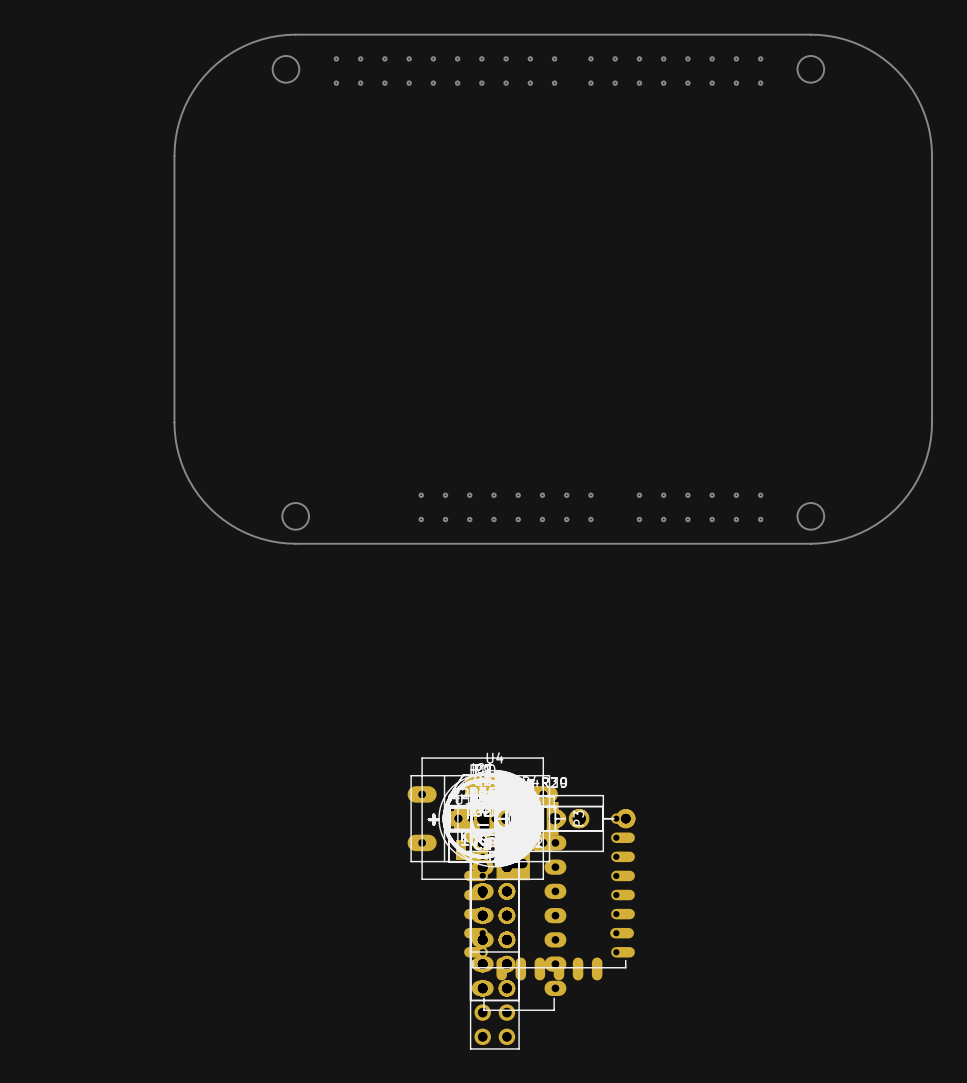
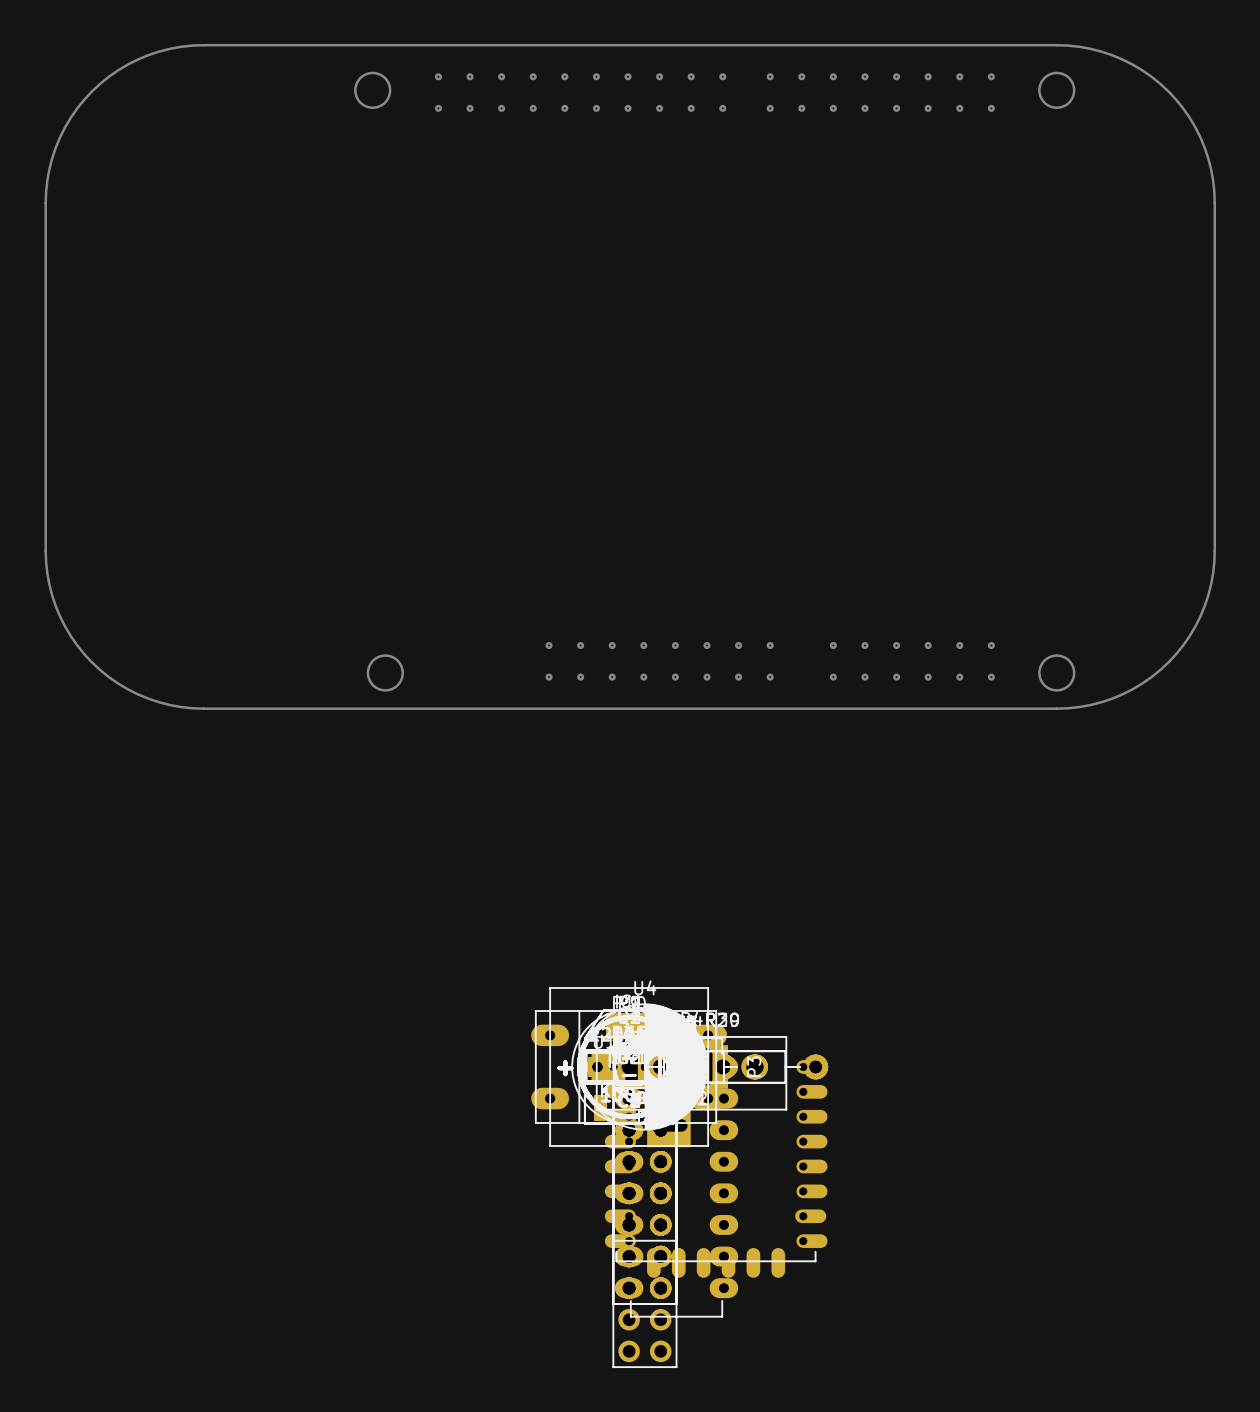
line: (295, 34) (278, 35) (253, 42) (230, 53) (209, 70) (193, 90) (185, 105) (177, 130) (174, 155) (174, 422) (179, 456) (193, 488) (209, 508) (223, 519) (245, 532) (261, 538) (295, 543) -> (385, 45) (192, 45) (159, 51) (138, 59) (118, 70) (100, 83) (84, 99) (70, 117) (59, 137) (52, 158) (47, 180) (45, 203) (46, 561) (52, 595) (59, 616) (70, 636) (91, 662) (118, 683) (138, 694) (170, 705) (203, 708) (385, 708)

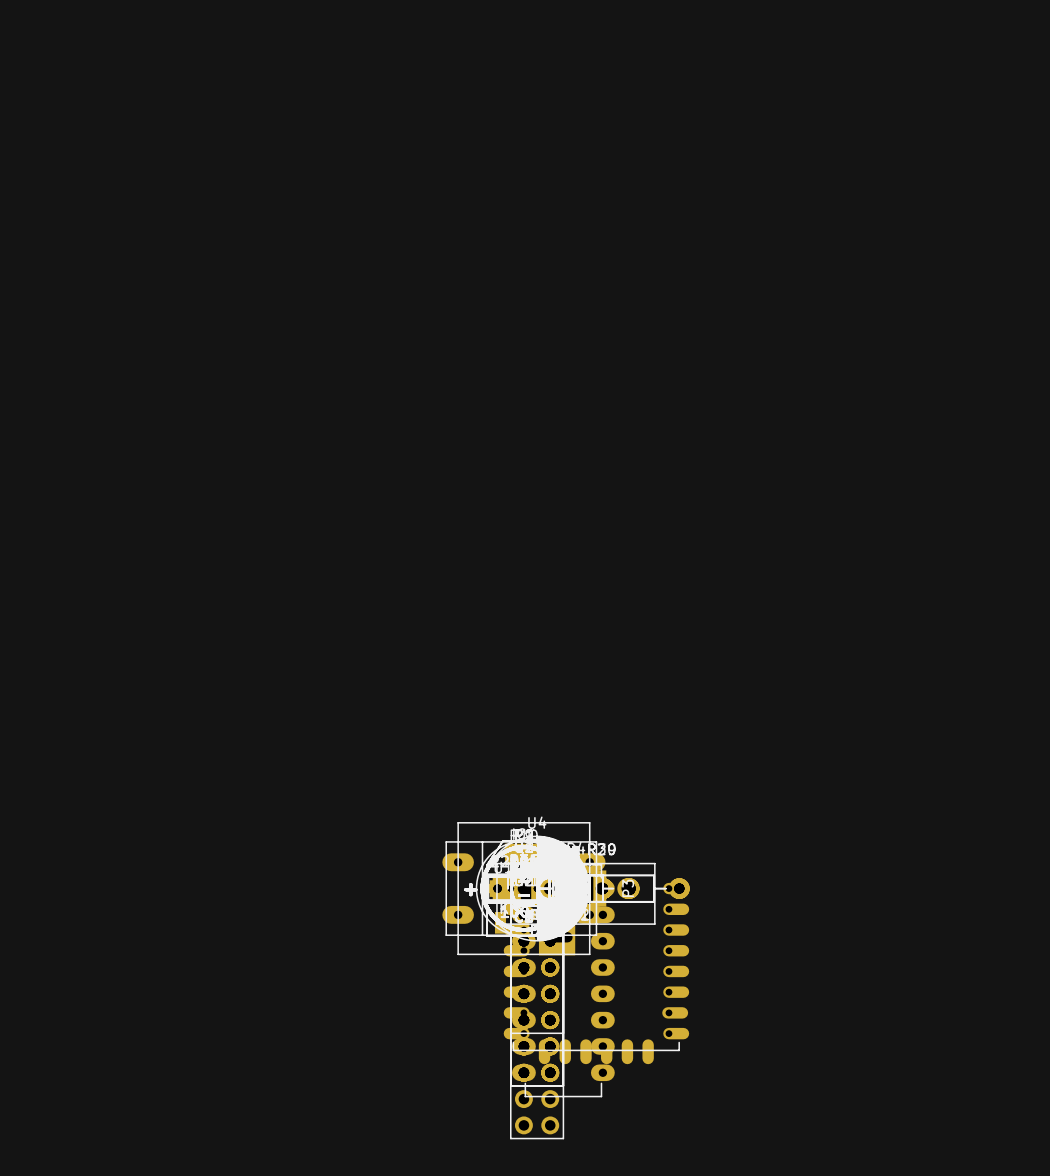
line: (203, 45) (1056, 45) (1090, 48) (1111, 55) (1132, 64) (1160, 83) (1183, 108) (1195, 127) (1204, 147) (1213, 180) (1214, 203) (1214, 561) (1208, 595) (1195, 626) (1183, 645) (1168, 662) (1142, 683) (1122, 694) (1101, 702) (1068, 708) (203, 708) (181, 707) (159, 702) (127, 689) (109, 677) (91, 662) (70, 636) (55, 605) (47, 573) (45, 550) (45, 203) (47, 180) (52, 158) (65, 127) (84, 99) (100, 83) (118, 70) (148, 55) (181, 46) (203, 45) -> none
drawing: [354, 71, 392, 109] -> none
drawing: [1038, 71, 1076, 109] -> none
drawing: [434, 73, 442, 81] -> none
drawing: [466, 73, 474, 81] -> none
drawing: [498, 73, 506, 81] -> none
drawing: [529, 73, 537, 81] -> none
drawing: [561, 73, 569, 81] -> none
drawing: [592, 73, 600, 81] -> none
drawing: [624, 73, 632, 81] -> none
drawing: [656, 73, 664, 81] -> none
drawing: [687, 73, 695, 81] -> none
drawing: [719, 73, 727, 81] -> none
drawing: [766, 73, 774, 81] -> none
drawing: [798, 73, 806, 81] -> none
drawing: [829, 73, 837, 81] -> none
drawing: [861, 73, 869, 81] -> none
drawing: [893, 73, 901, 81] -> none
drawing: [924, 73, 932, 81] -> none
drawing: [956, 73, 964, 81] -> none
drawing: [987, 73, 995, 81] -> none
drawing: [434, 104, 442, 112] -> none
drawing: [466, 104, 474, 112] -> none
drawing: [498, 104, 506, 112] -> none
drawing: [529, 104, 537, 112] -> none
drawing: [561, 104, 569, 112] -> none
drawing: [592, 104, 600, 112] -> none
drawing: [624, 104, 632, 112] -> none
drawing: [656, 104, 664, 112] -> none
drawing: [687, 104, 695, 112] -> none
drawing: [719, 104, 727, 112] -> none
drawing: [766, 104, 774, 112] -> none
drawing: [798, 104, 806, 112] -> none
drawing: [829, 104, 837, 112] -> none
drawing: [861, 104, 869, 112] -> none
drawing: [893, 104, 901, 112] -> none
drawing: [924, 104, 932, 112] -> none
drawing: [956, 104, 964, 112] -> none
drawing: [987, 104, 995, 112] -> none
drawing: [545, 641, 553, 650] -> none
drawing: [577, 641, 585, 650] -> none
drawing: [608, 641, 616, 650] -> none
drawing: [640, 641, 648, 650] -> none
drawing: [671, 641, 679, 650] -> none
drawing: [703, 641, 711, 650] -> none
drawing: [735, 641, 743, 650] -> none
drawing: [766, 641, 774, 650] -> none
drawing: [829, 641, 837, 650] -> none
drawing: [861, 641, 869, 650] -> none
drawing: [893, 641, 901, 650] -> none
drawing: [924, 641, 932, 650] -> none
drawing: [956, 641, 964, 650] -> none
drawing: [987, 641, 995, 650] -> none
drawing: [366, 654, 405, 692] -> none
drawing: [1038, 654, 1076, 692] -> none
drawing: [545, 673, 553, 681] -> none
drawing: [577, 673, 585, 681] -> none
drawing: [608, 673, 616, 681] -> none
drawing: [640, 673, 648, 681] -> none
drawing: [671, 673, 679, 681] -> none
drawing: [703, 673, 711, 681] -> none
drawing: [735, 673, 743, 681] -> none
drawing: [766, 673, 774, 681] -> none
drawing: [829, 673, 837, 681] -> none
drawing: [861, 673, 869, 681] -> none
drawing: [893, 673, 901, 681] -> none
drawing: [924, 673, 932, 681] -> none
drawing: [956, 673, 964, 681] -> none
drawing: [987, 673, 995, 681] -> none

